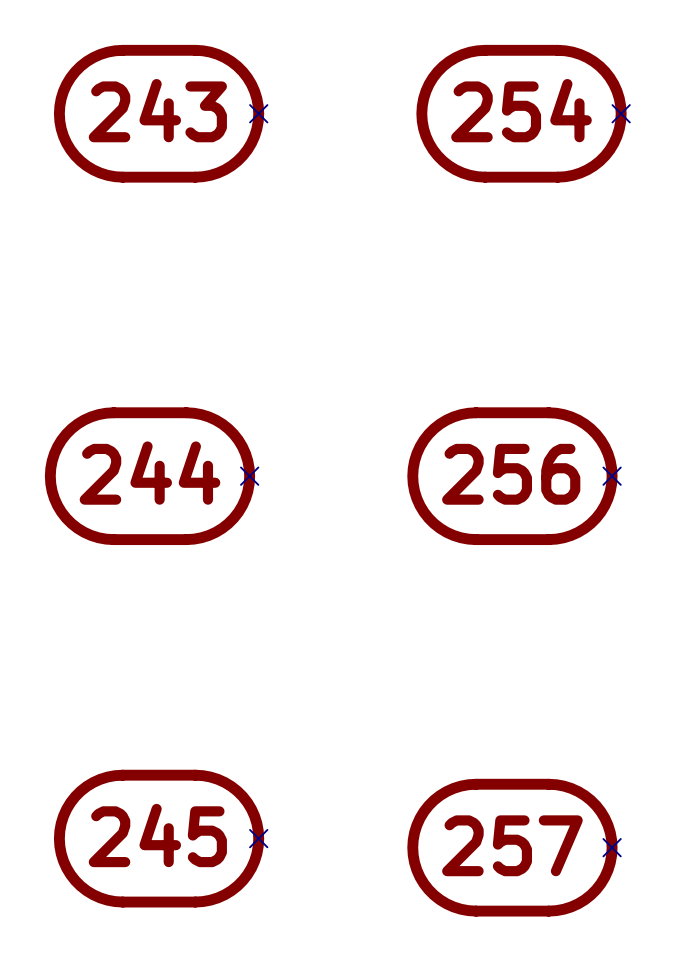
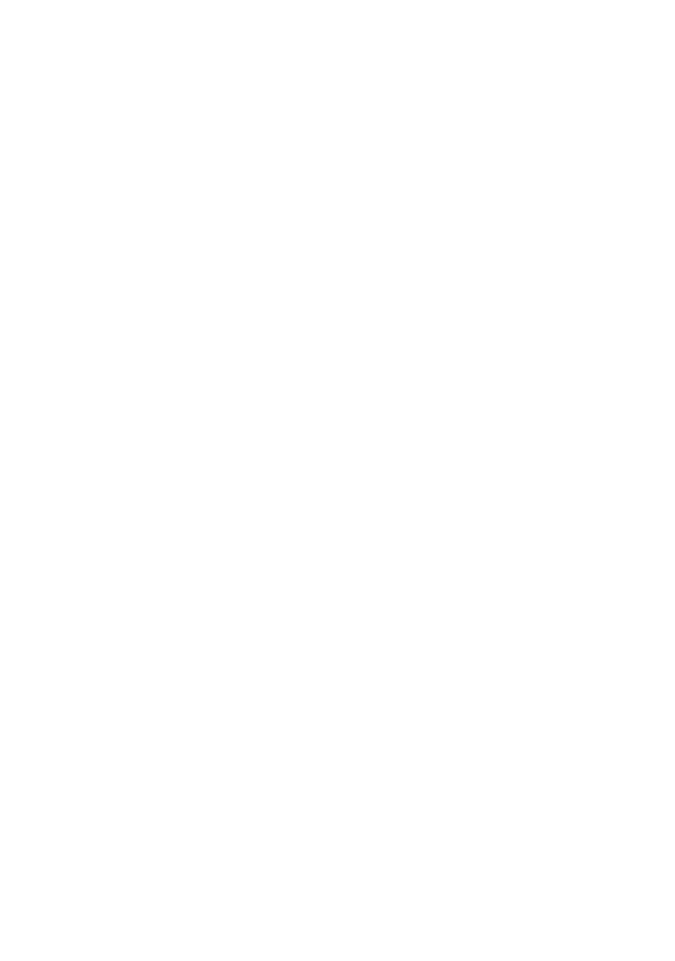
part: (159, 113) -> none
no-connect mark: (258, 113) -> none
part: (521, 113) -> none
no-connect mark: (621, 113) -> none
part: (149, 476) -> none
no-connect mark: (249, 476) -> none
part: (512, 476) -> none
no-connect mark: (612, 476) -> none
part: (159, 838) -> none
no-connect mark: (258, 838) -> none
part: (512, 847) -> none
no-connect mark: (612, 847) -> none

